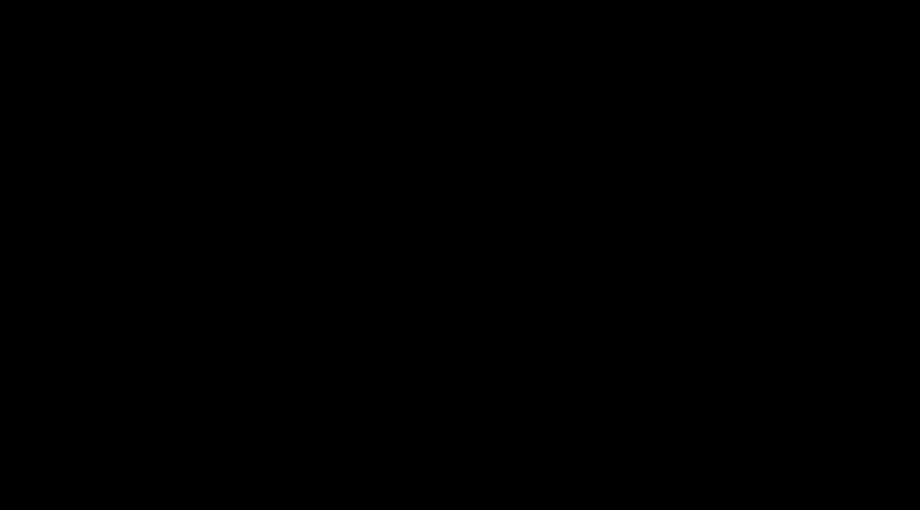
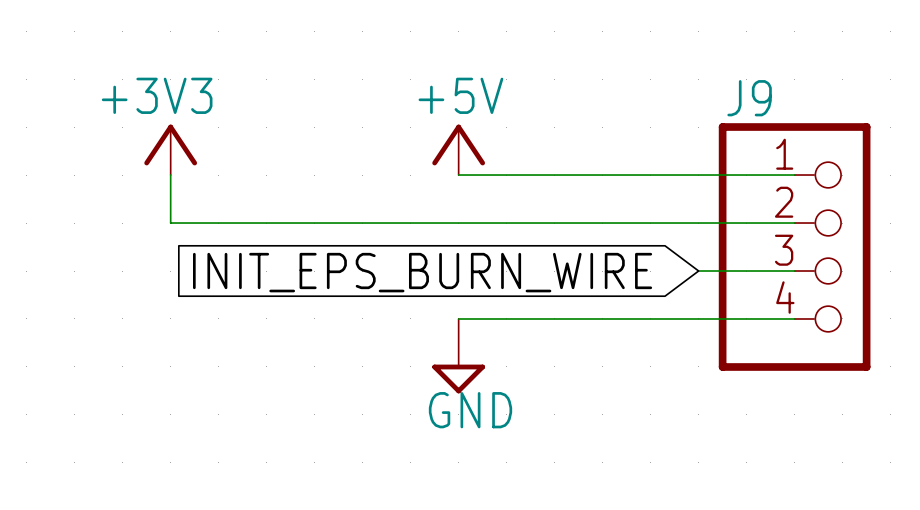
power symbol: none -> +3V3 (170, 149)
power symbol: none -> +5V (458, 149)
wire: none -> (170, 175) (170, 223) (794, 223)
wire: none -> (458, 175) (794, 175)
J9: none -> (794, 247)
wire: none -> (698, 271) (794, 271)
global label: none -> INIT_EPS_BURN_WIRE (422, 272)
wire: none -> (458, 318) (794, 318)
power symbol: none -> GND (458, 356)

